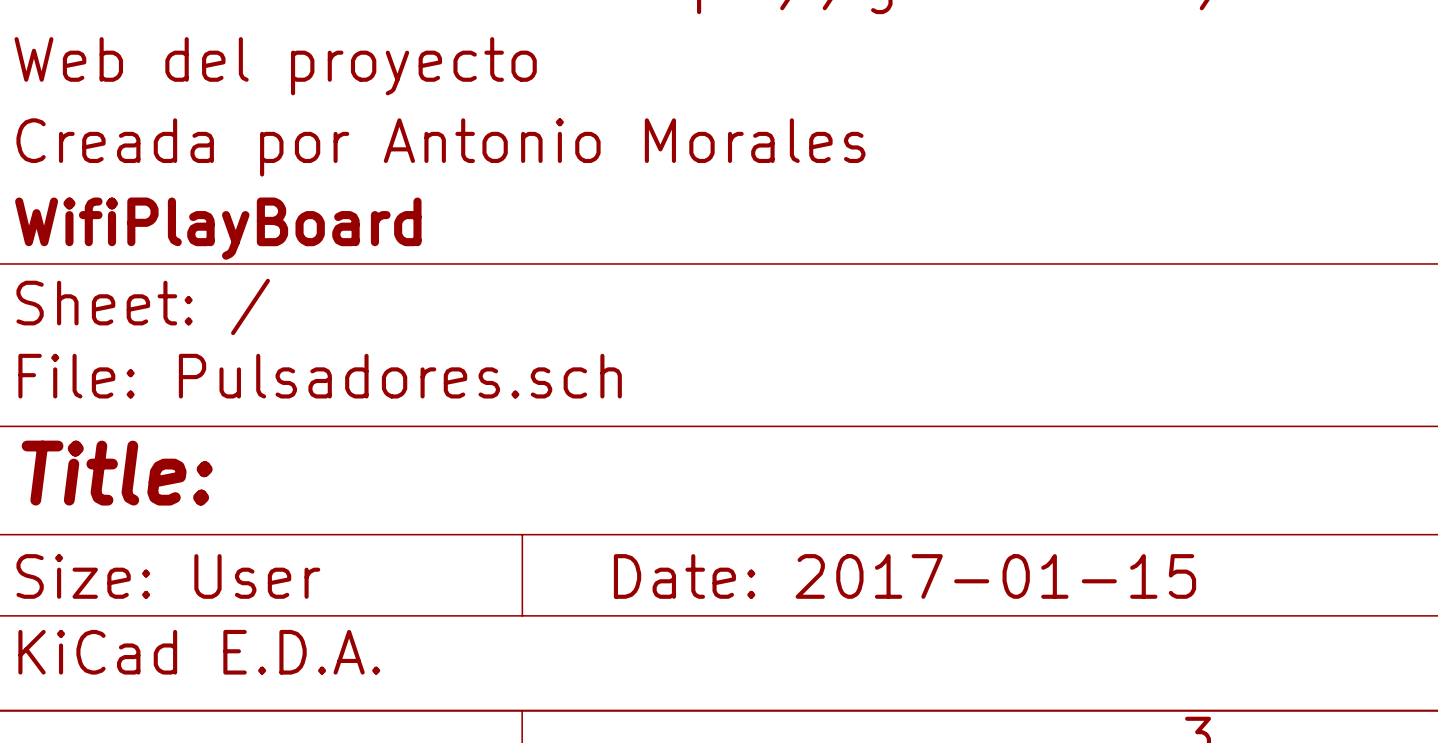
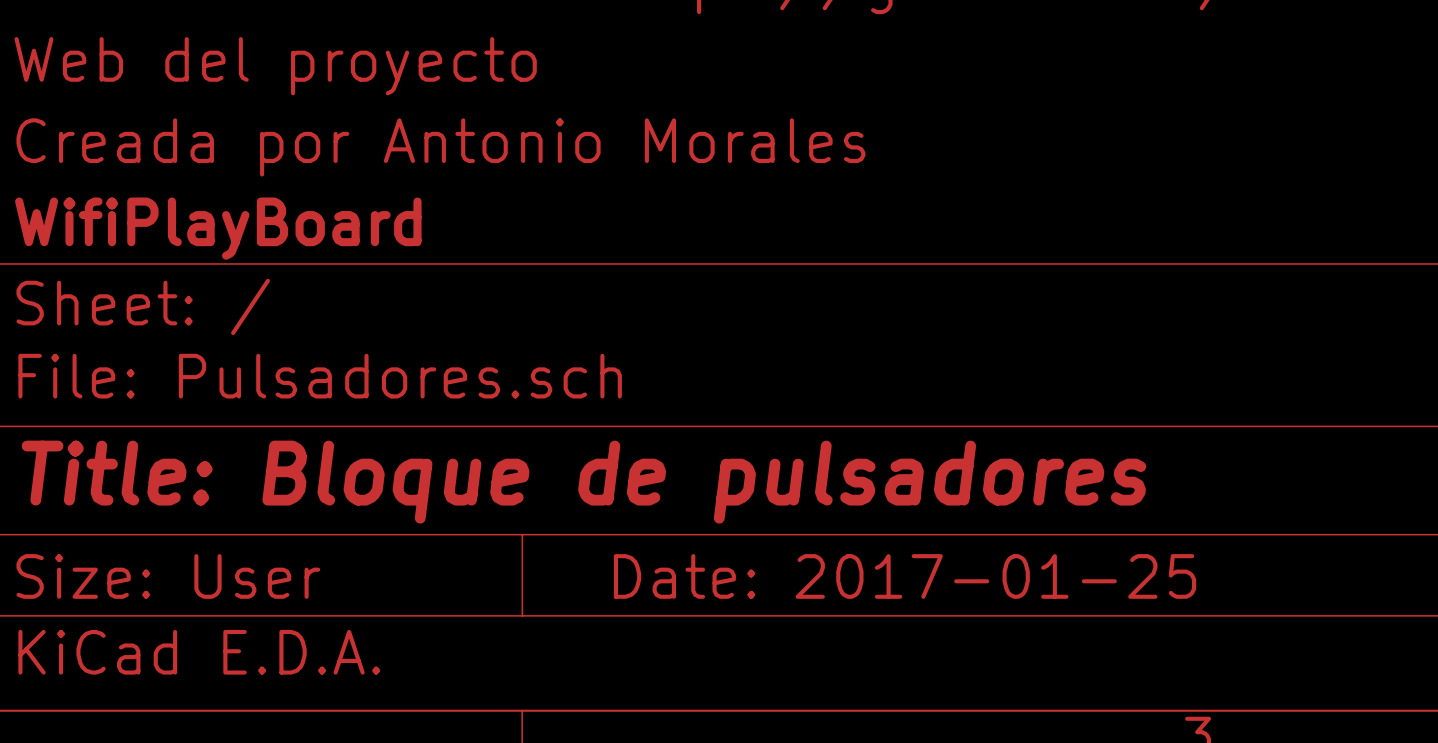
title block: Title: (117, 473) -> Title: Bloque de pulsadores (583, 482)
title block: Date: 2017-01-15 (904, 576) -> Date: 2017-01-25 (904, 576)

